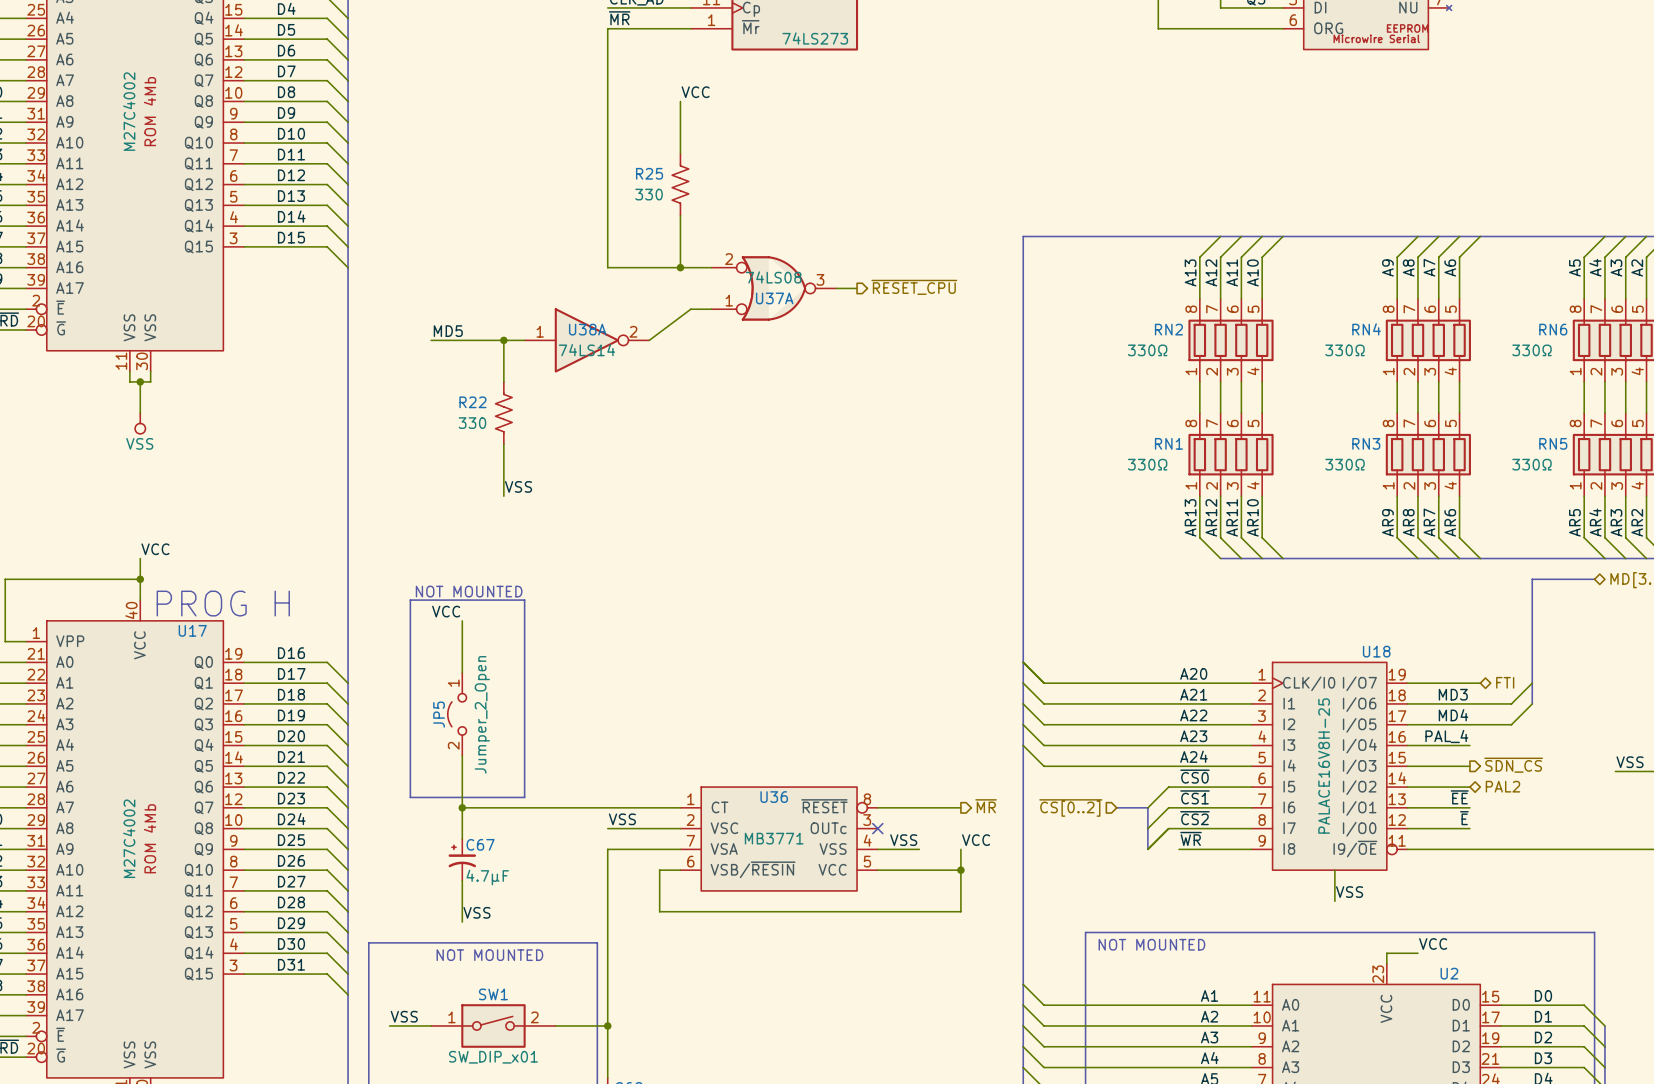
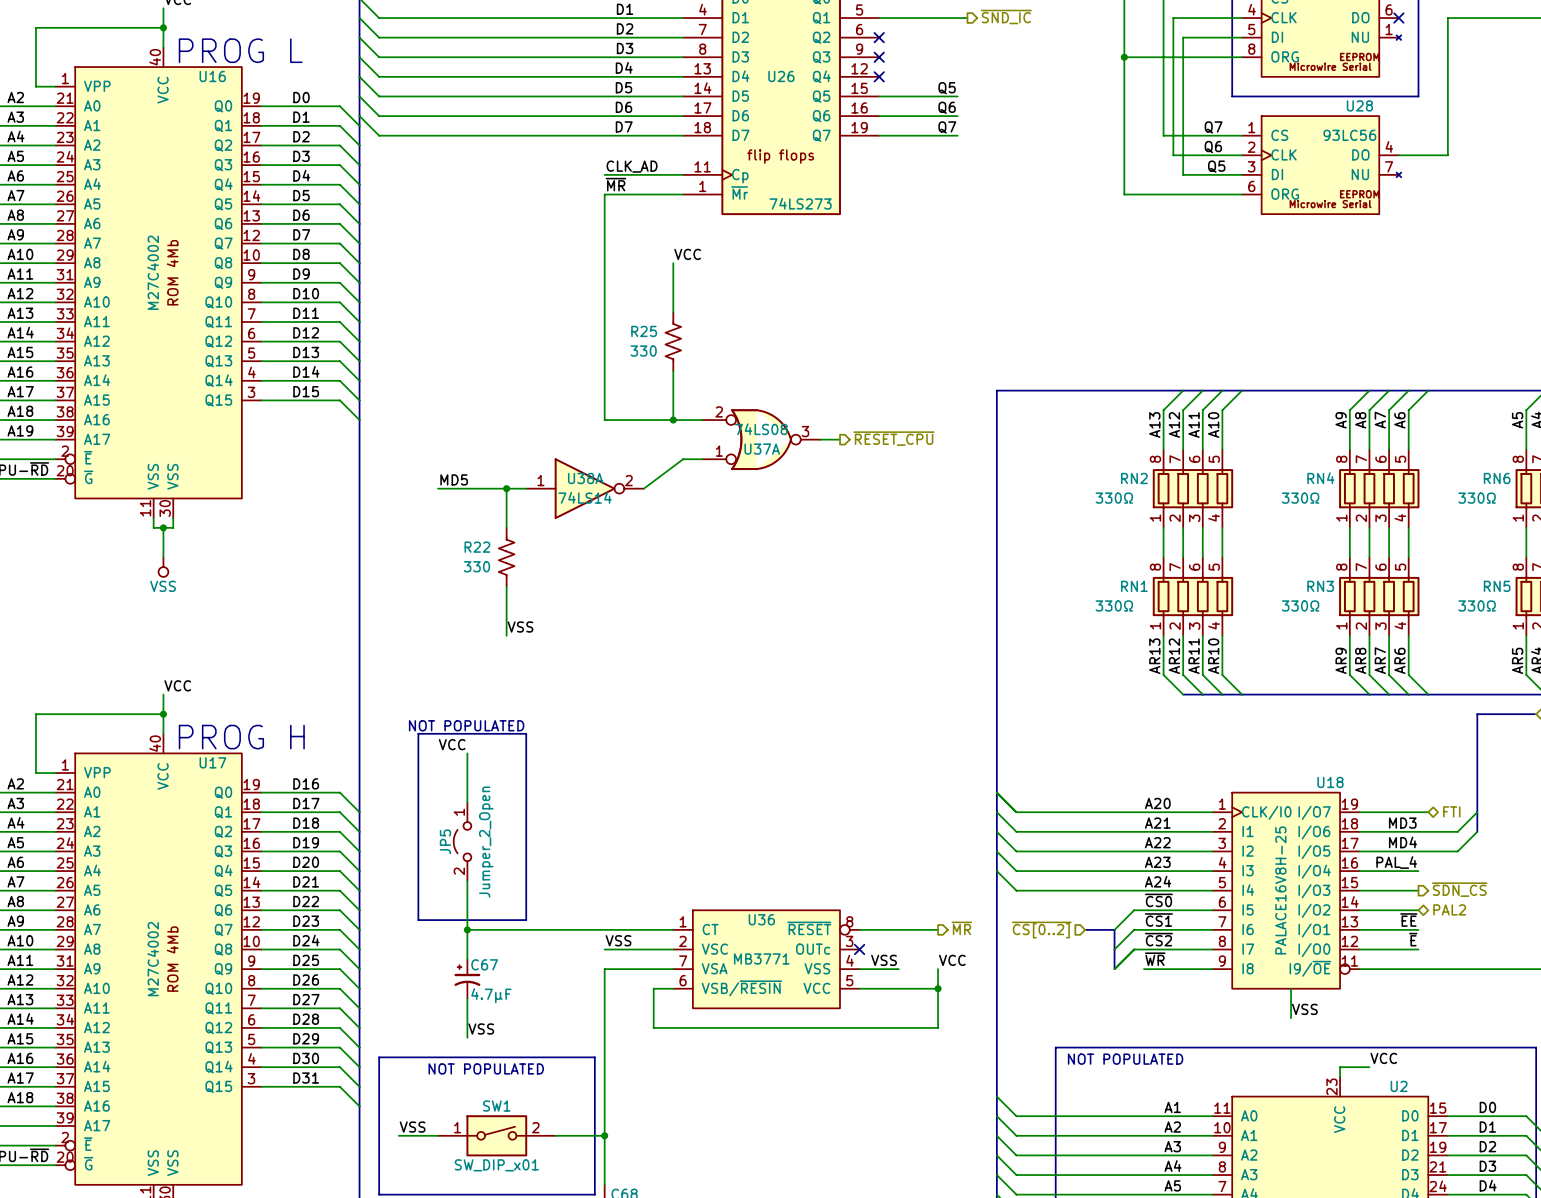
text: NOT MOUNTED (469, 591) -> NOT POPULATED (466, 725)
text: NOT MOUNTED (1151, 944) -> NOT POPULATED (1125, 1059)
text: NOT MOUNTED (489, 955) -> NOT POPULATED (486, 1068)

